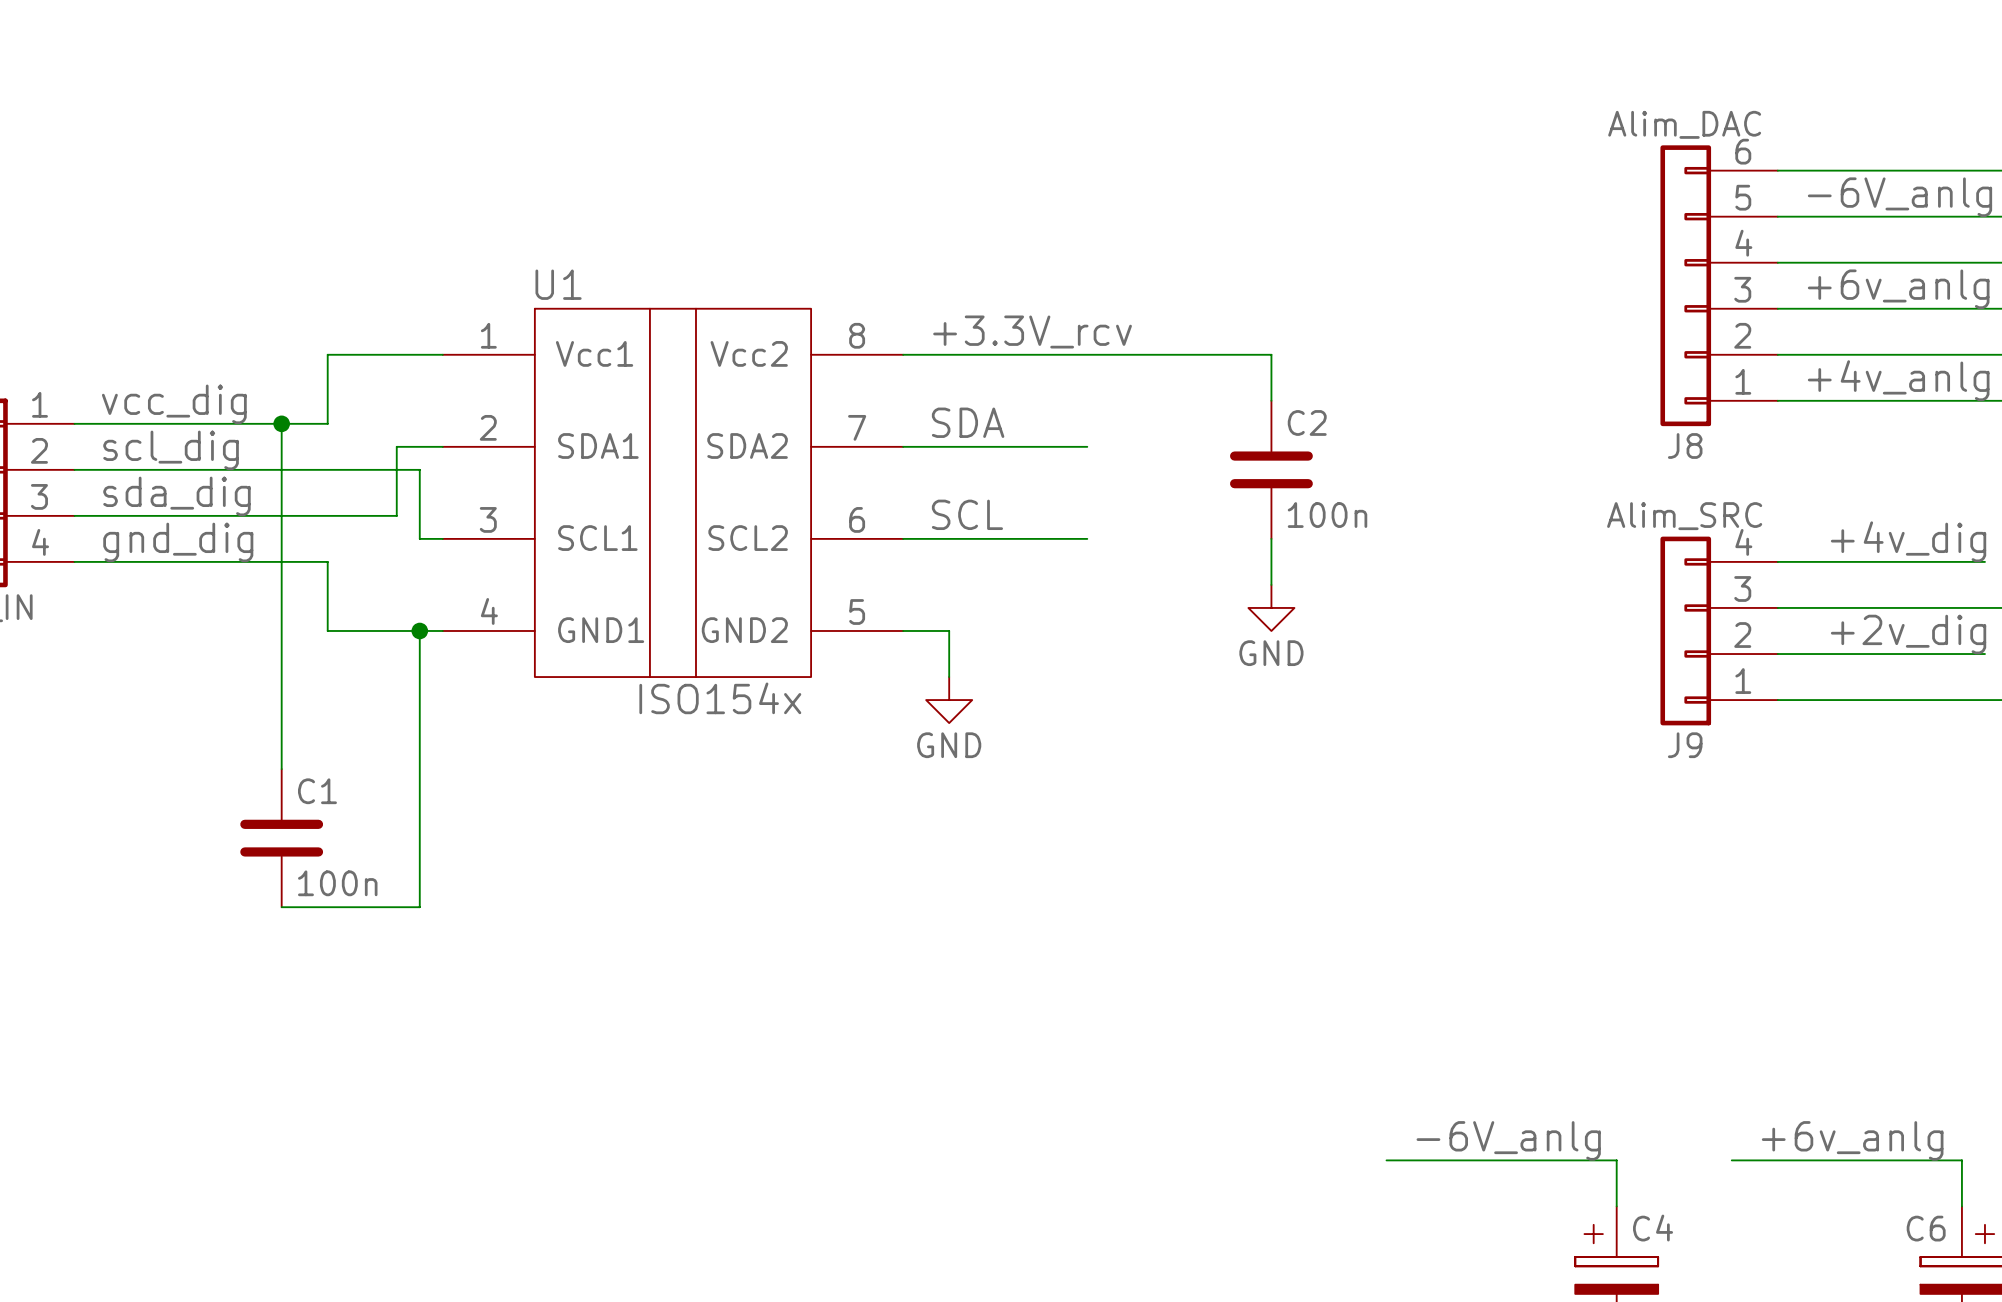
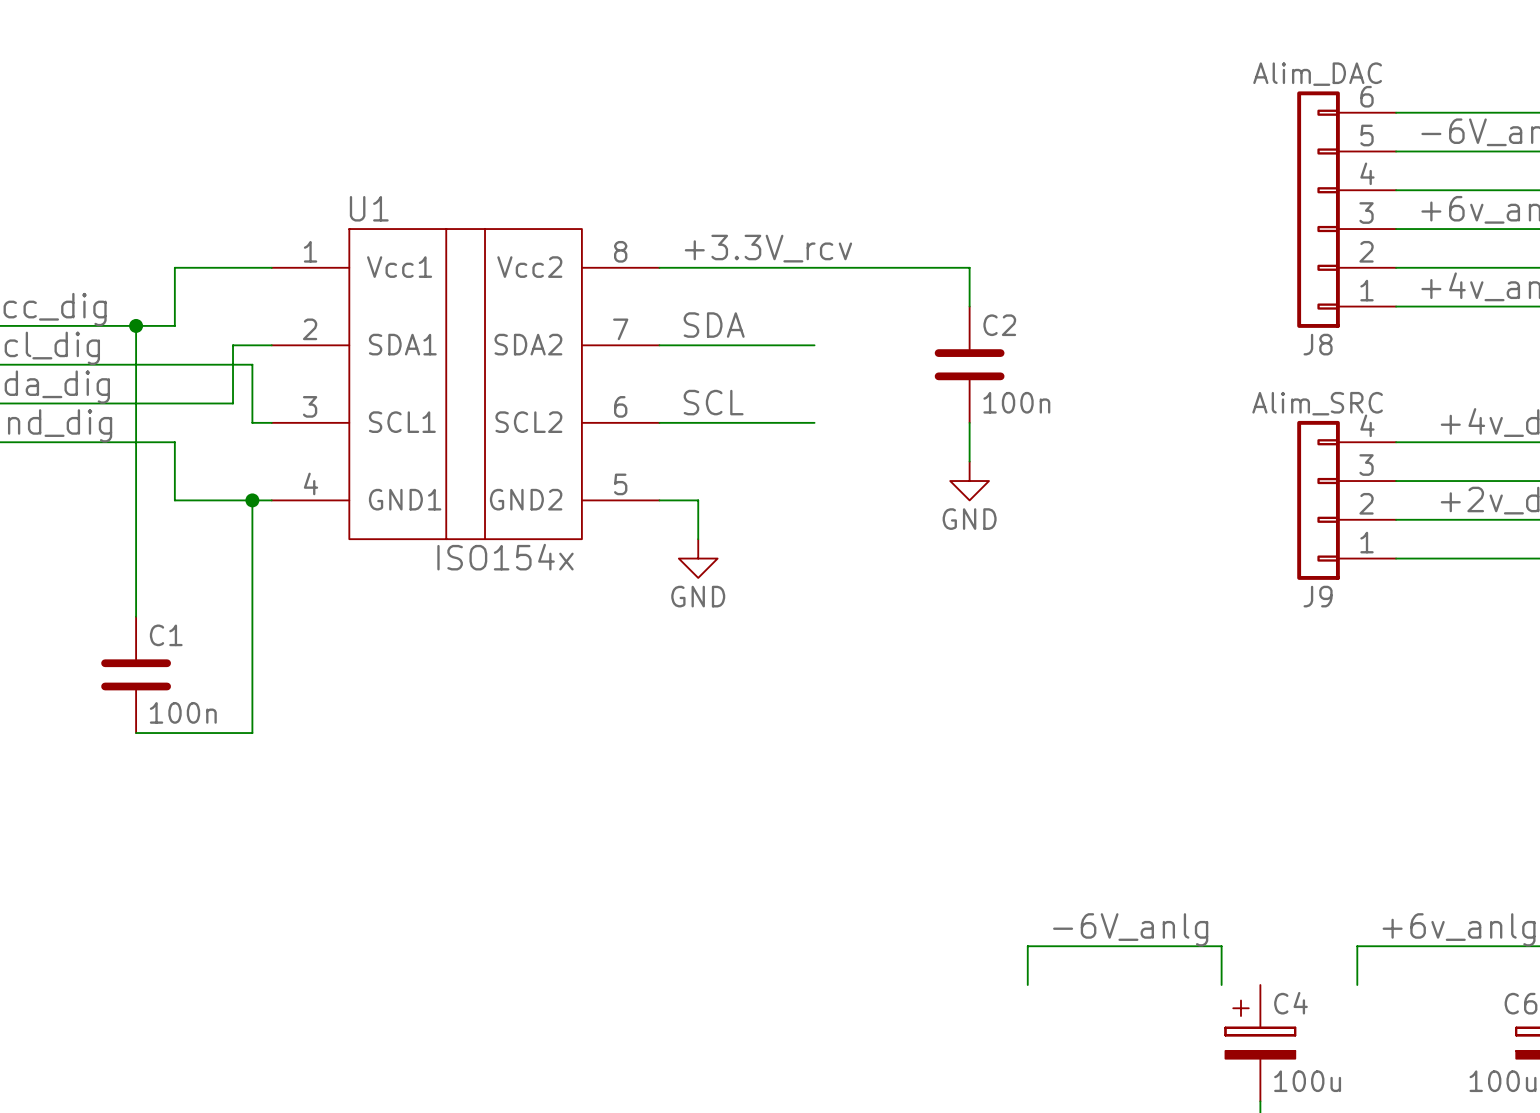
label position: -6V_anlg (1508, 1140) -> -6V_anlg (1130, 929)
wire: none -> (1066, 946) (1027, 946) (1027, 985)
wire: (1570, 1160) (1616, 1160) (1616, 1206) -> (1221, 946) (1221, 985)
wire: none -> (1357, 946) (1357, 985)

